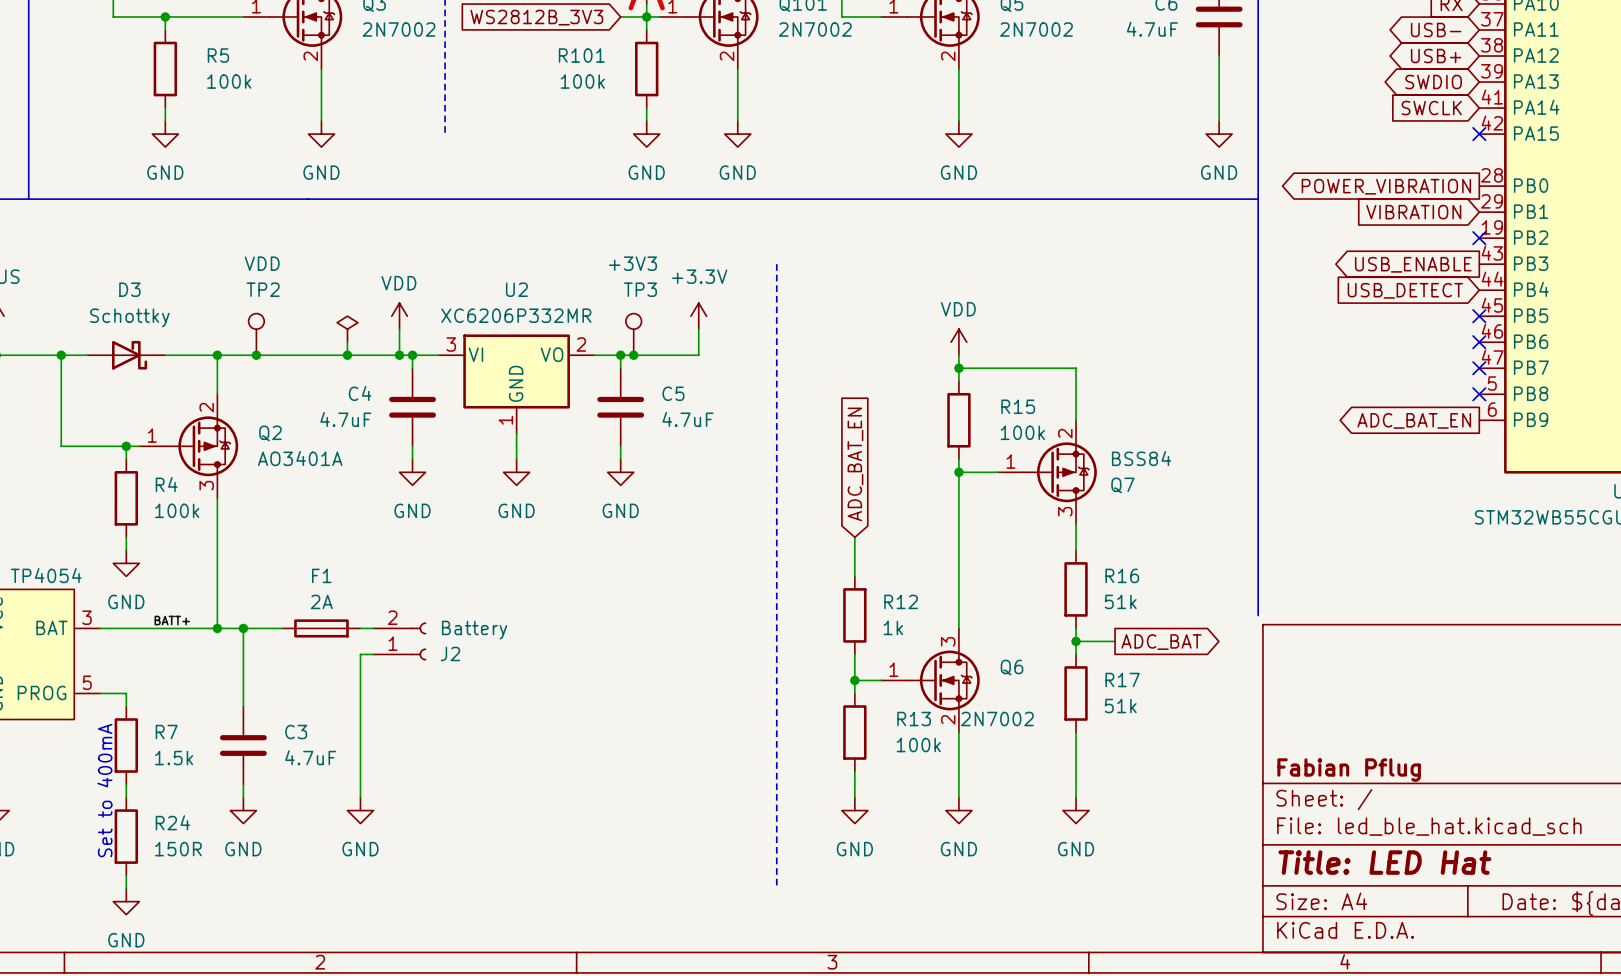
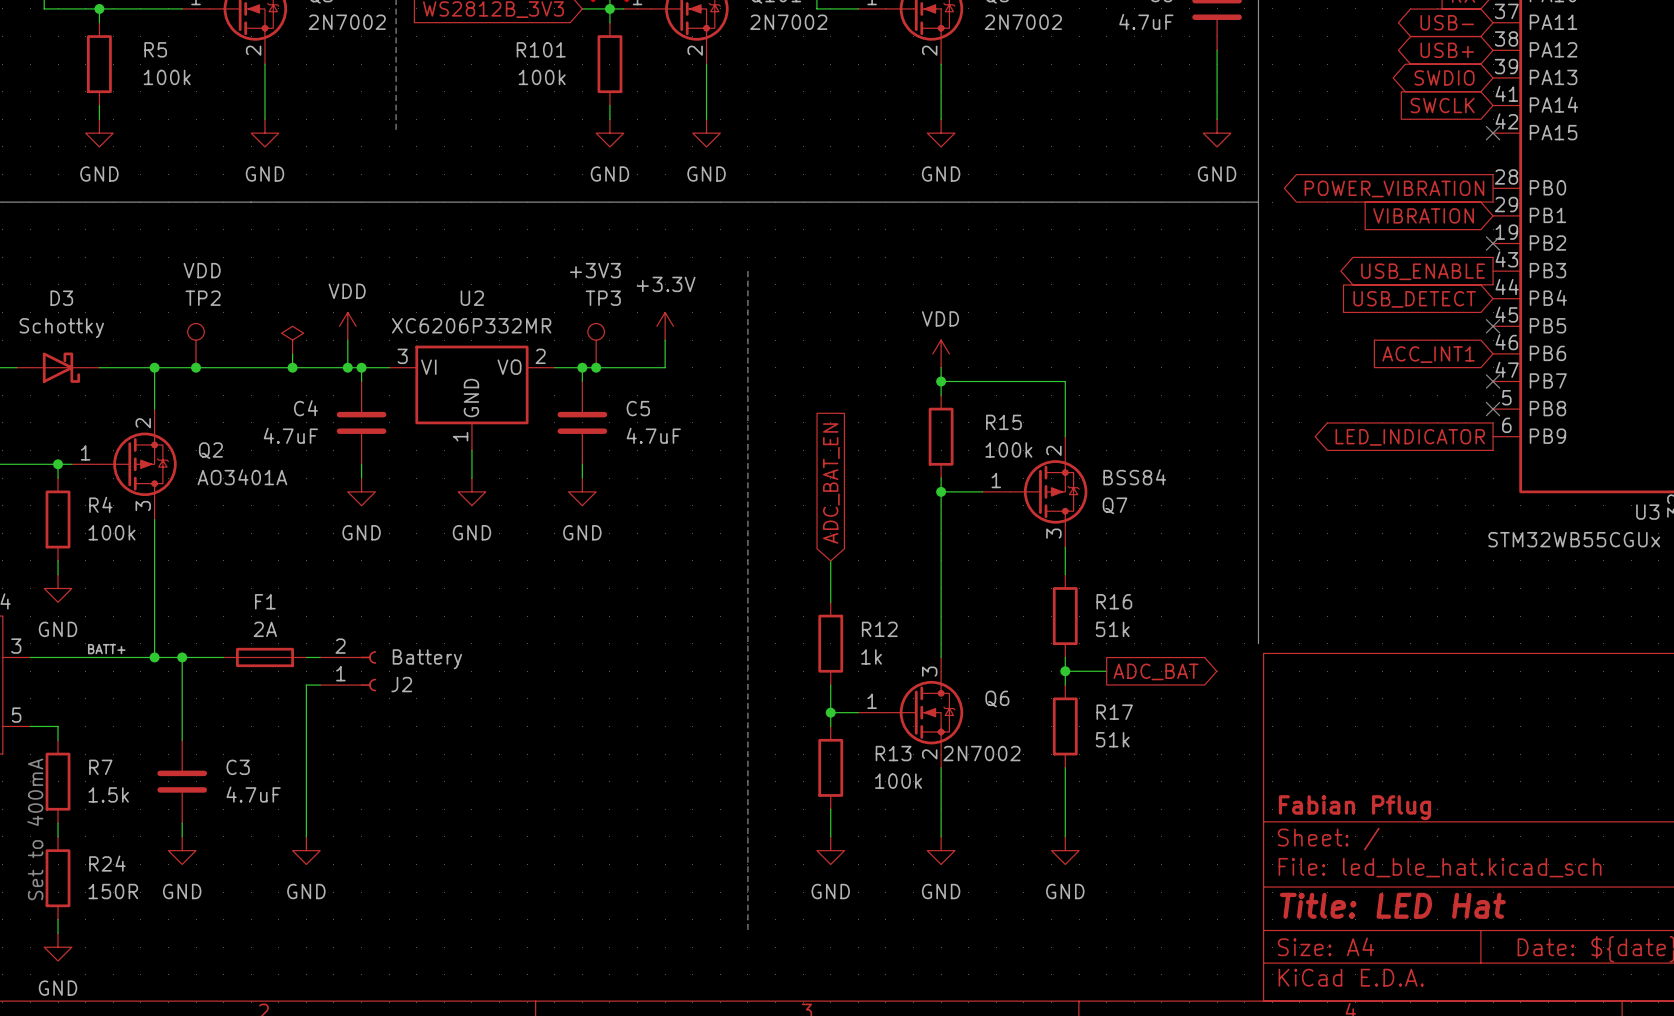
global label: none -> ACC_INT1 (1428, 354)
no-connect mark: (1479, 342) -> none
global label: ADC_BAT_EN (1414, 420) -> LED_INDICATOR (1410, 437)

